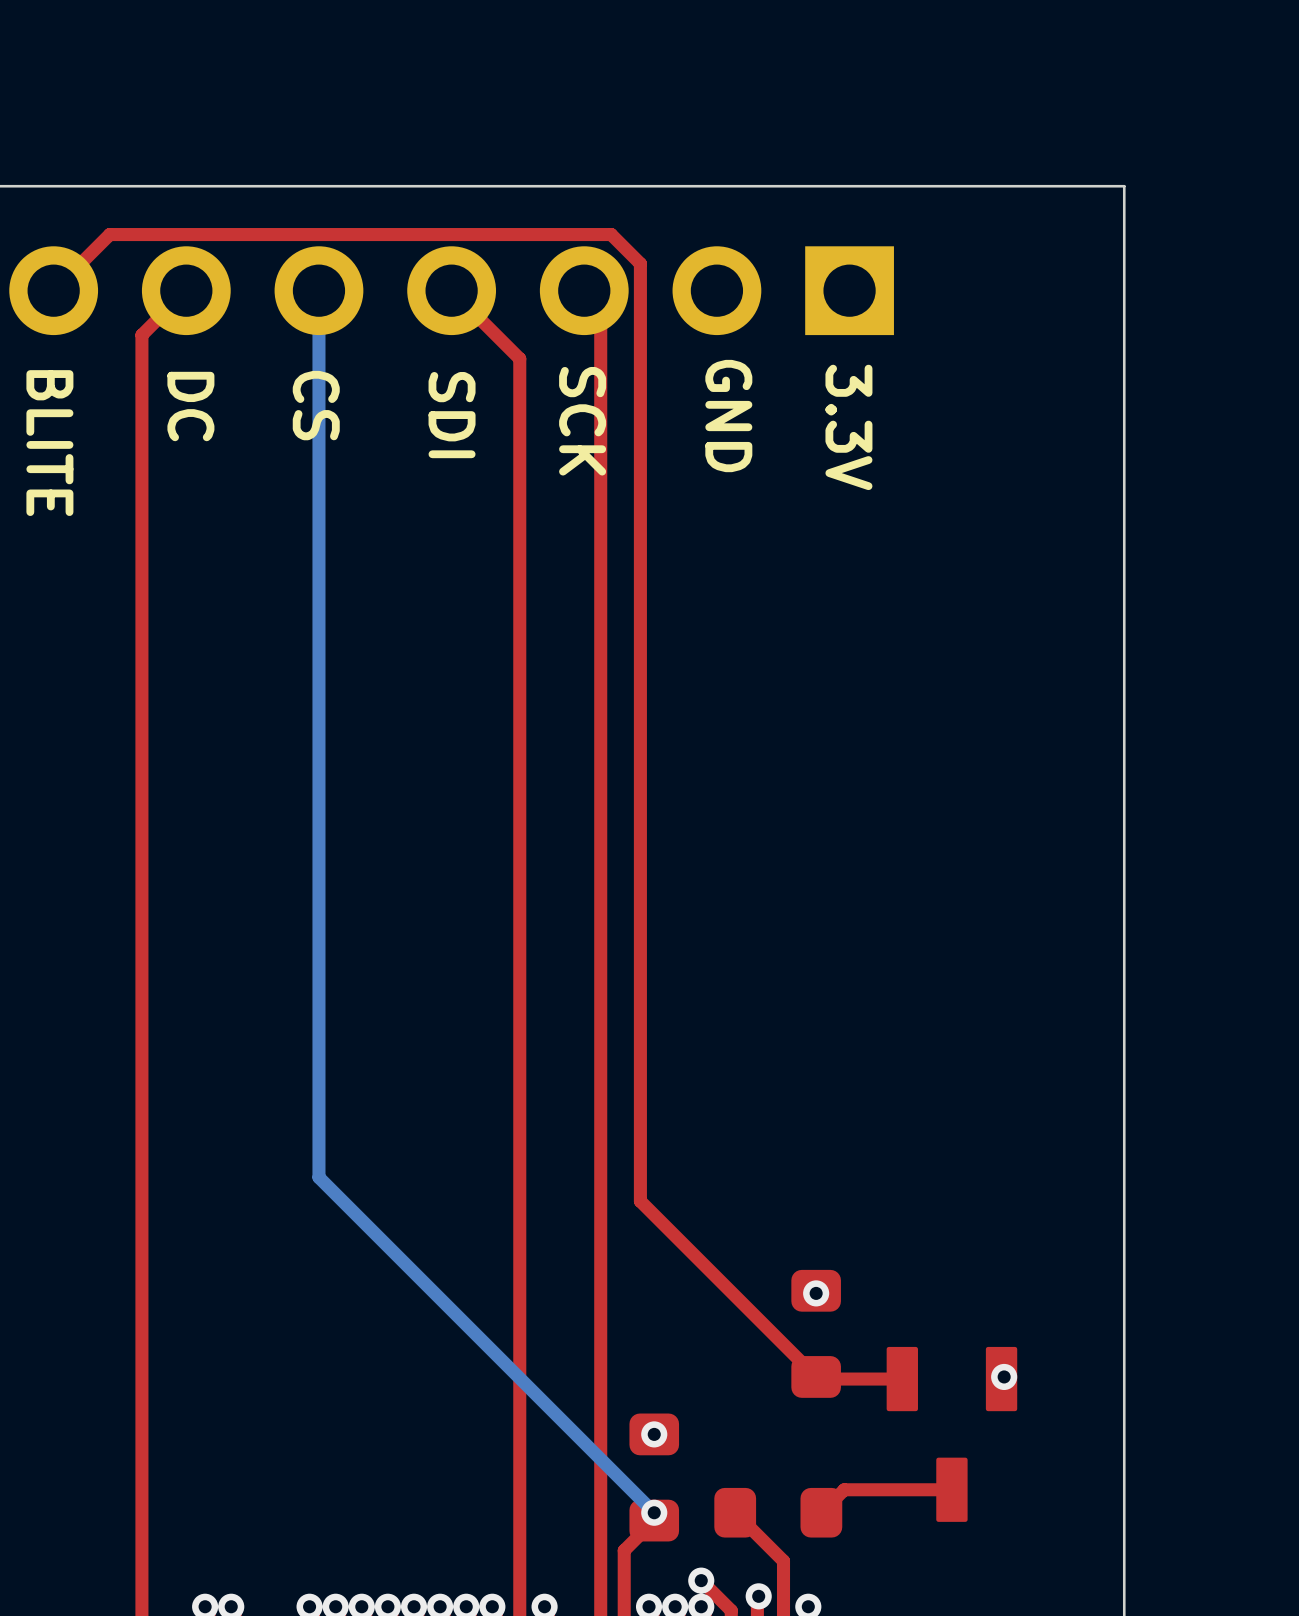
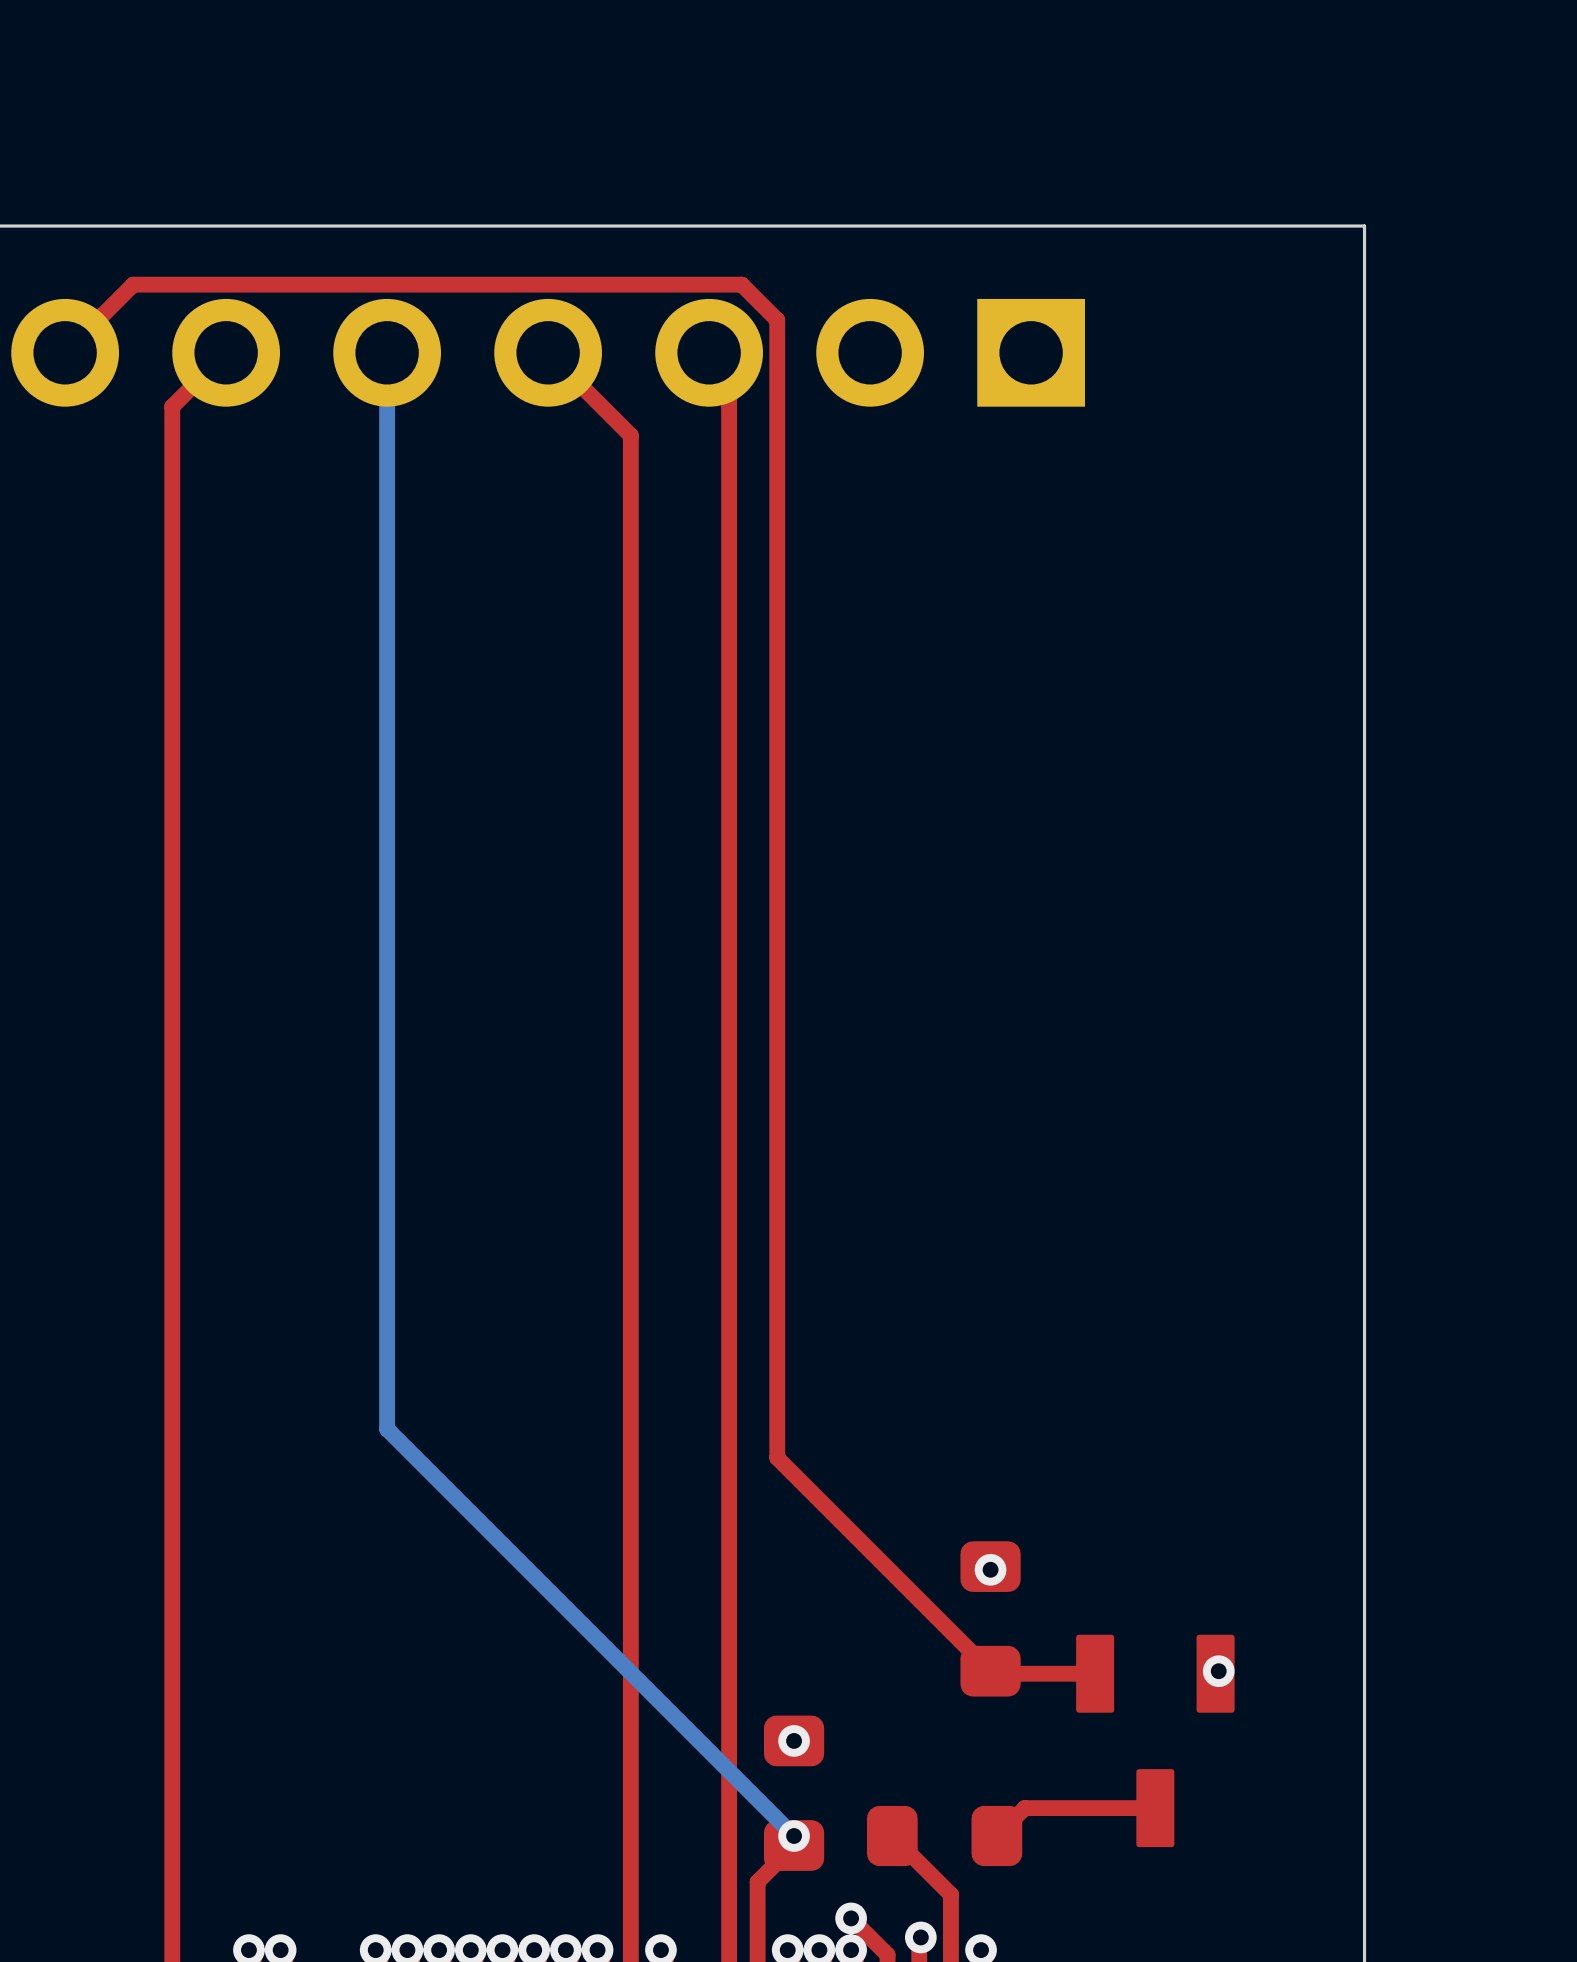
text: CS (316, 405) -> none
text: DC (190, 406) -> none
text: SDI (452, 415) -> none
text: GND (728, 416) -> none
text: SCK (582, 421) -> none
text: 3.3V (848, 427) -> none
text: BLITE (49, 443) -> none

